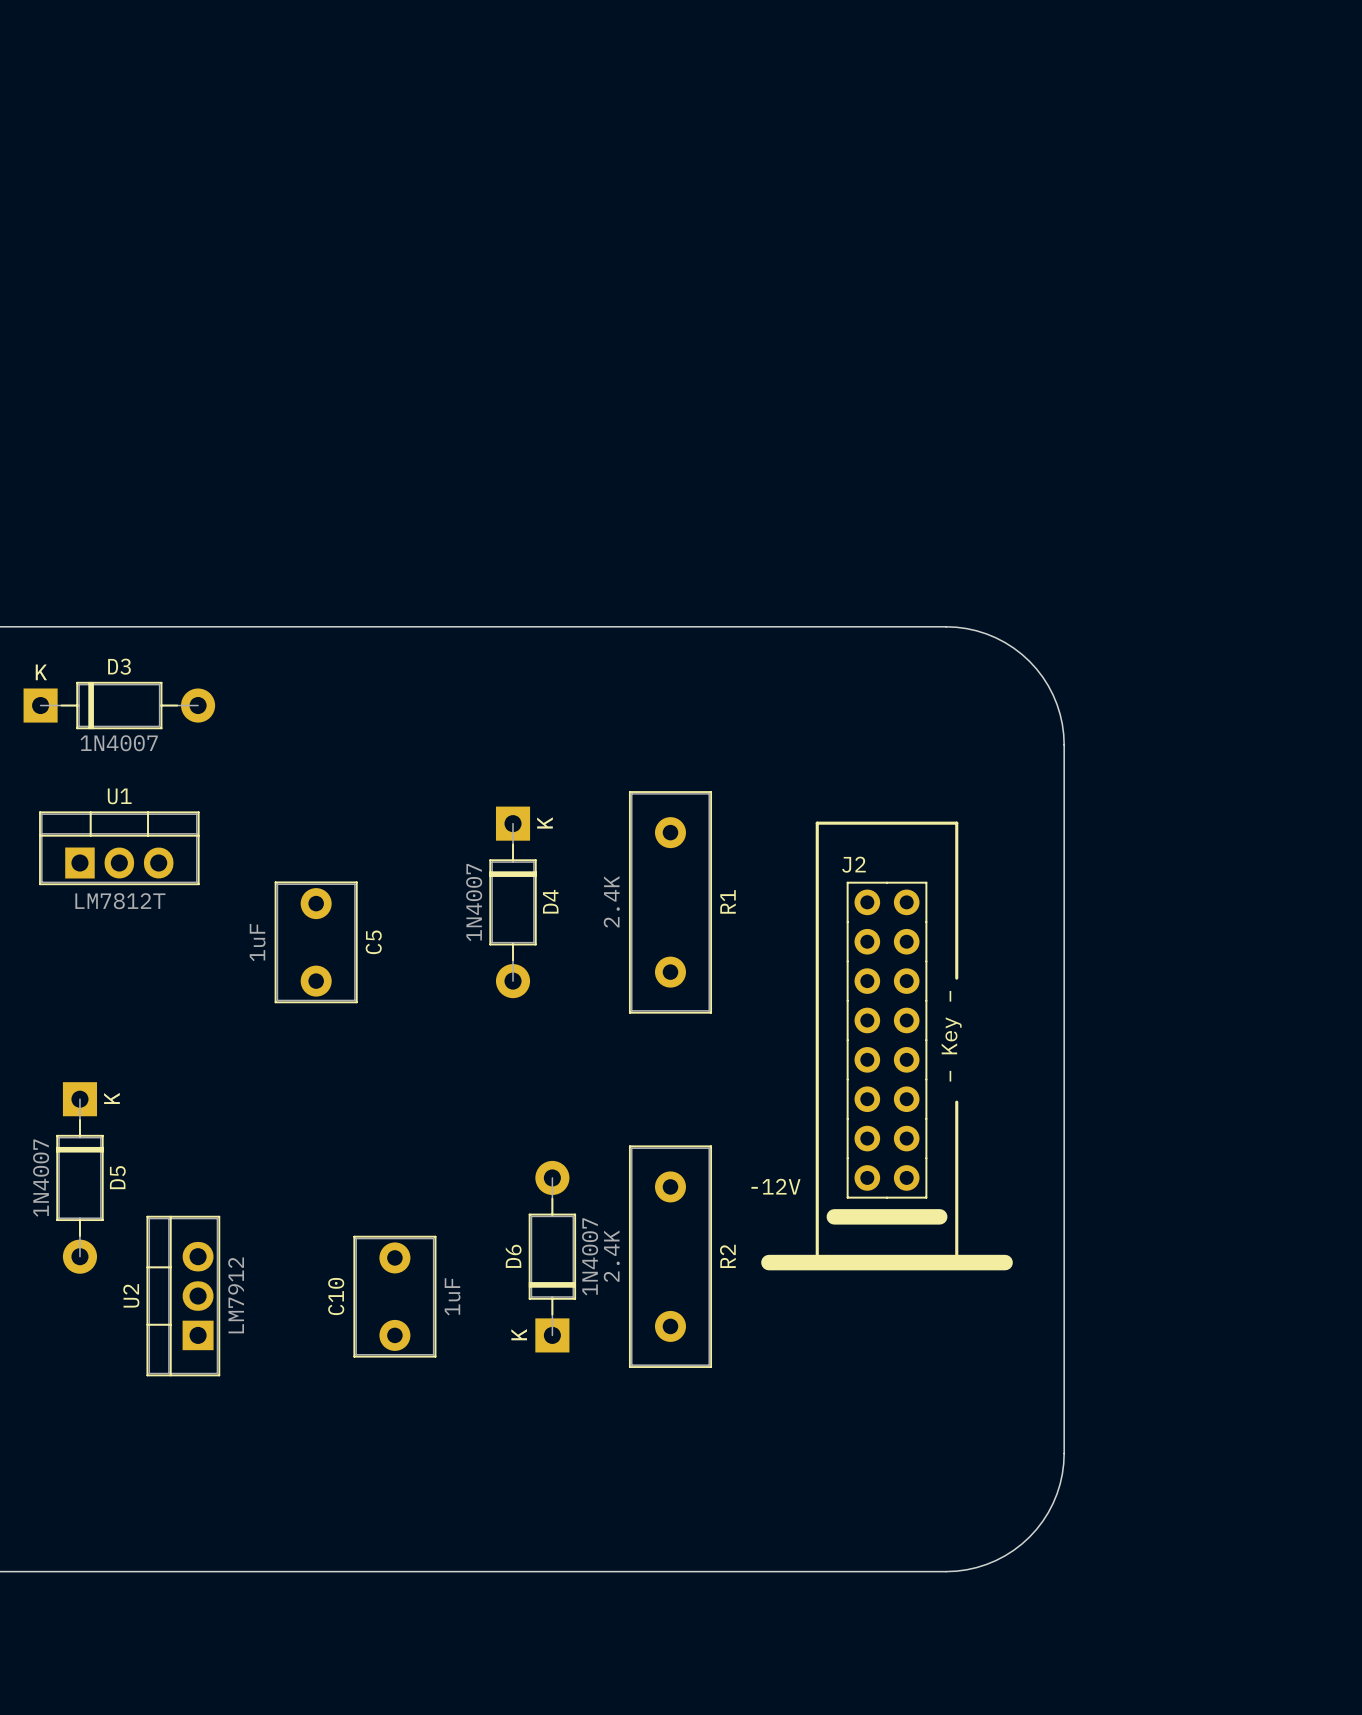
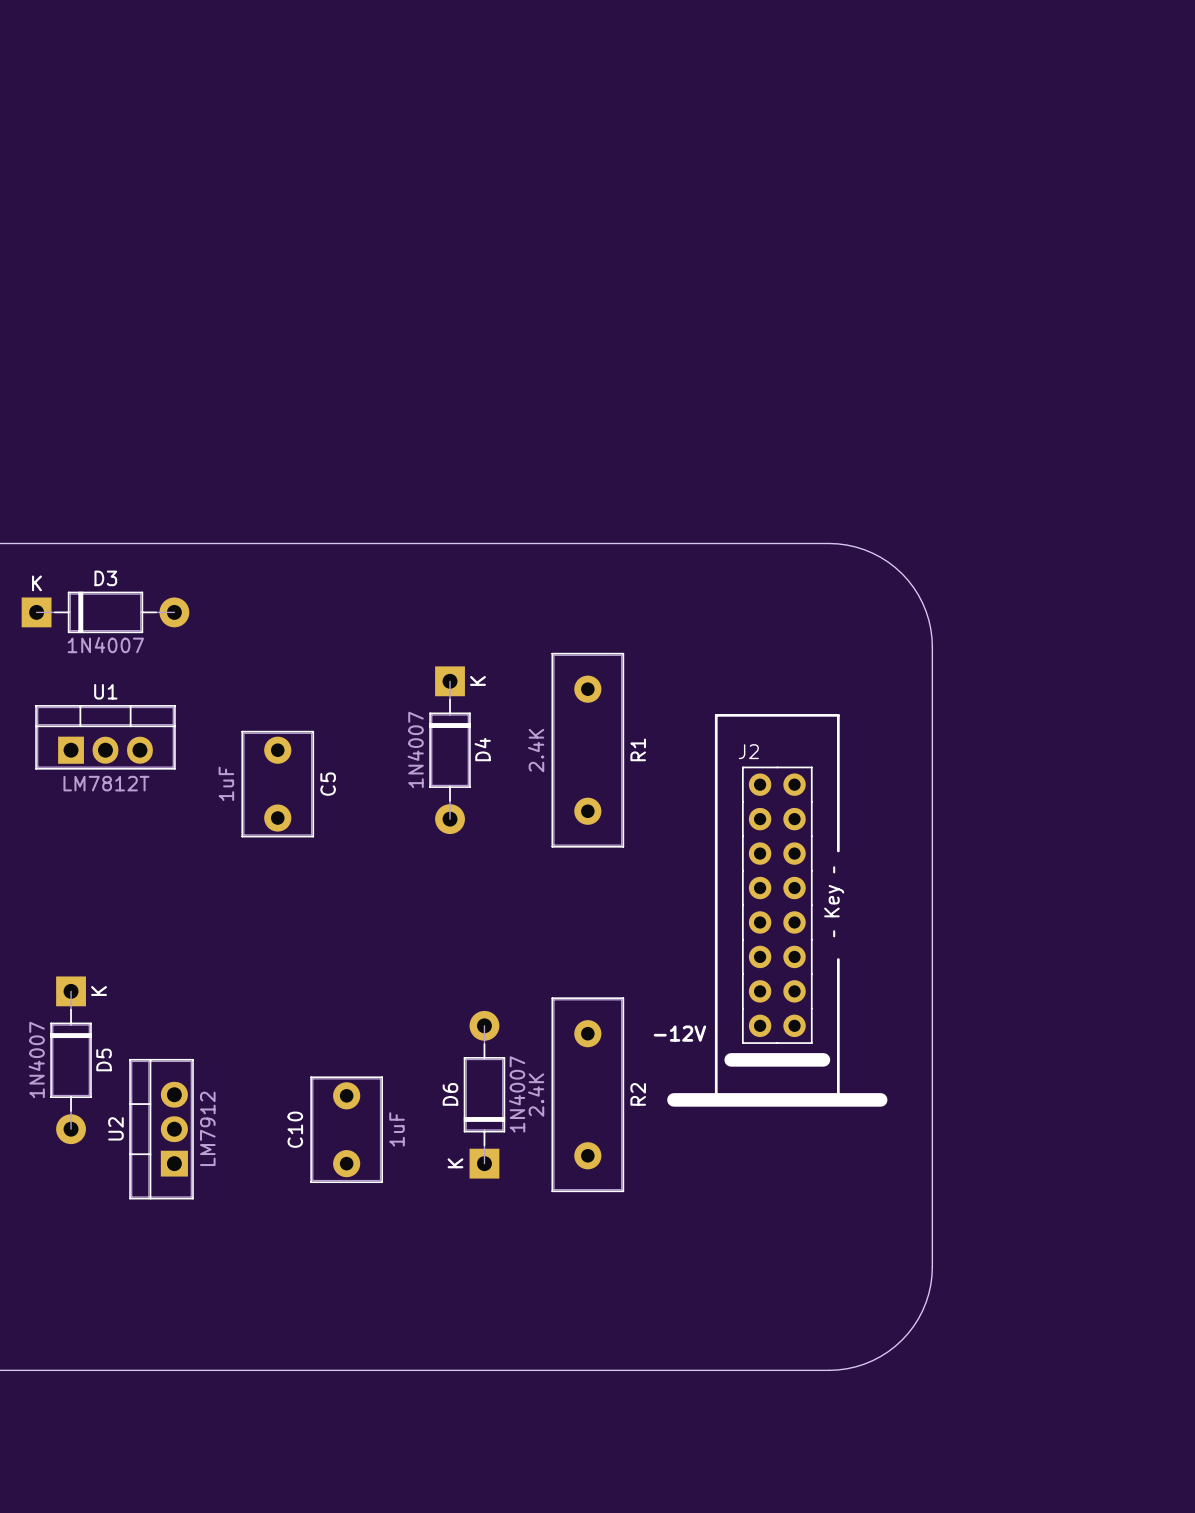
D4 position: (513, 902) -> (450, 750)
R1 position: (670, 902) -> (587, 750)
C5 position: (316, 942) -> (277, 784)
D5 position: (79, 1177) -> (71, 1060)

